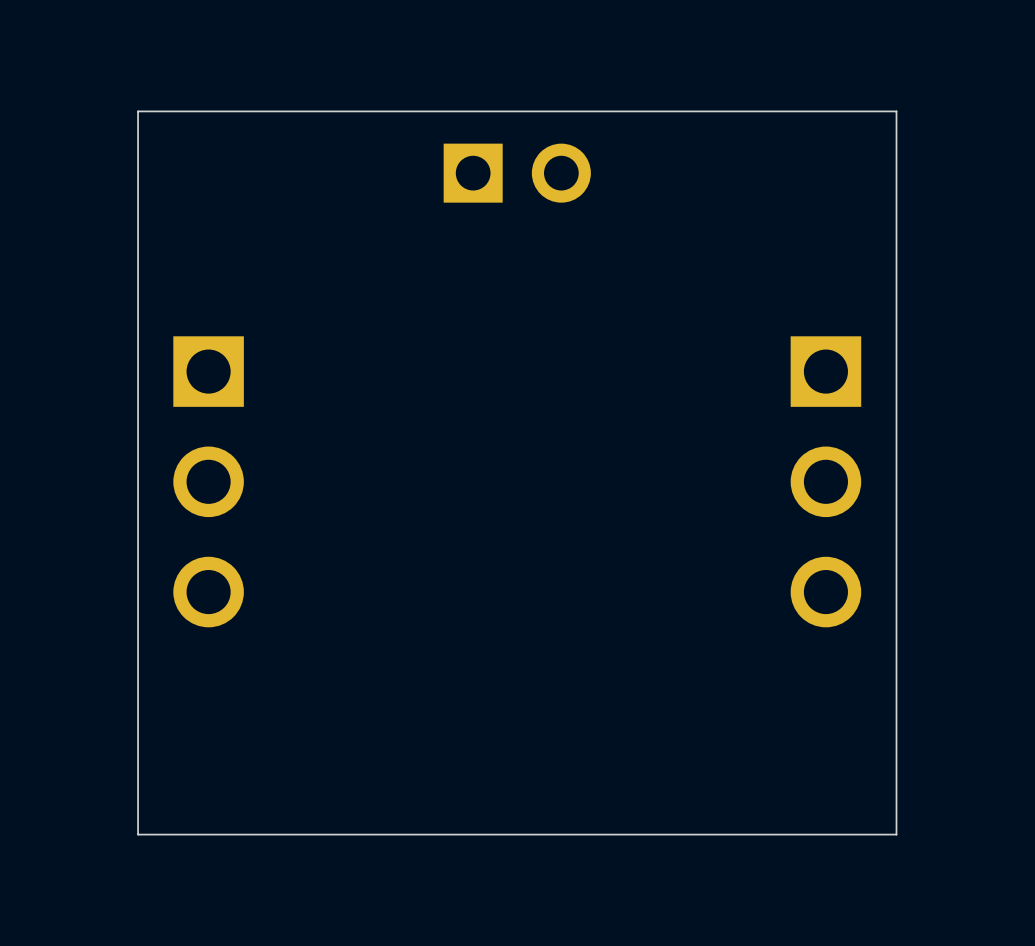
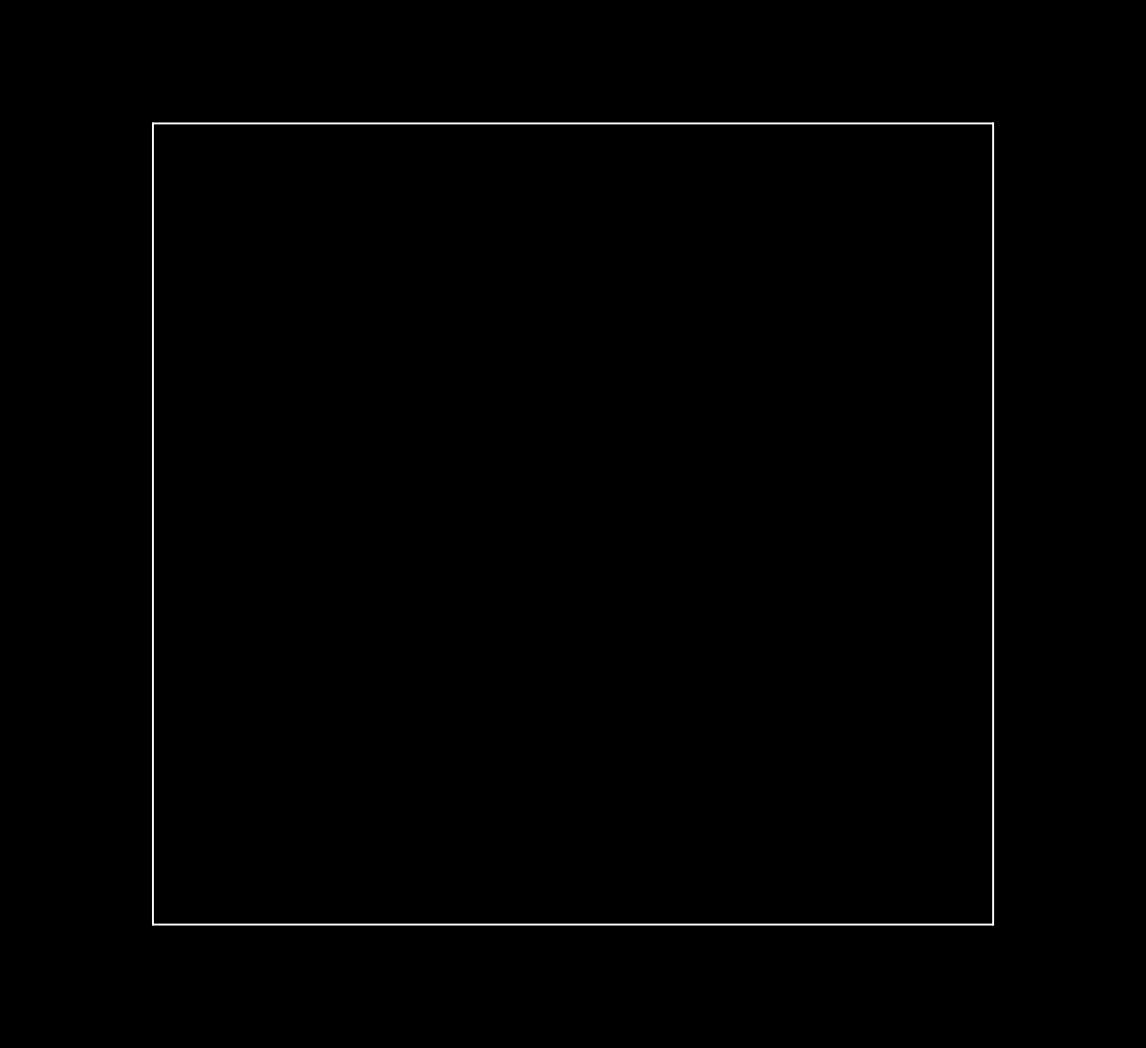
part: (517, 173) -> none
part: (208, 481) -> none
part: (825, 481) -> none

